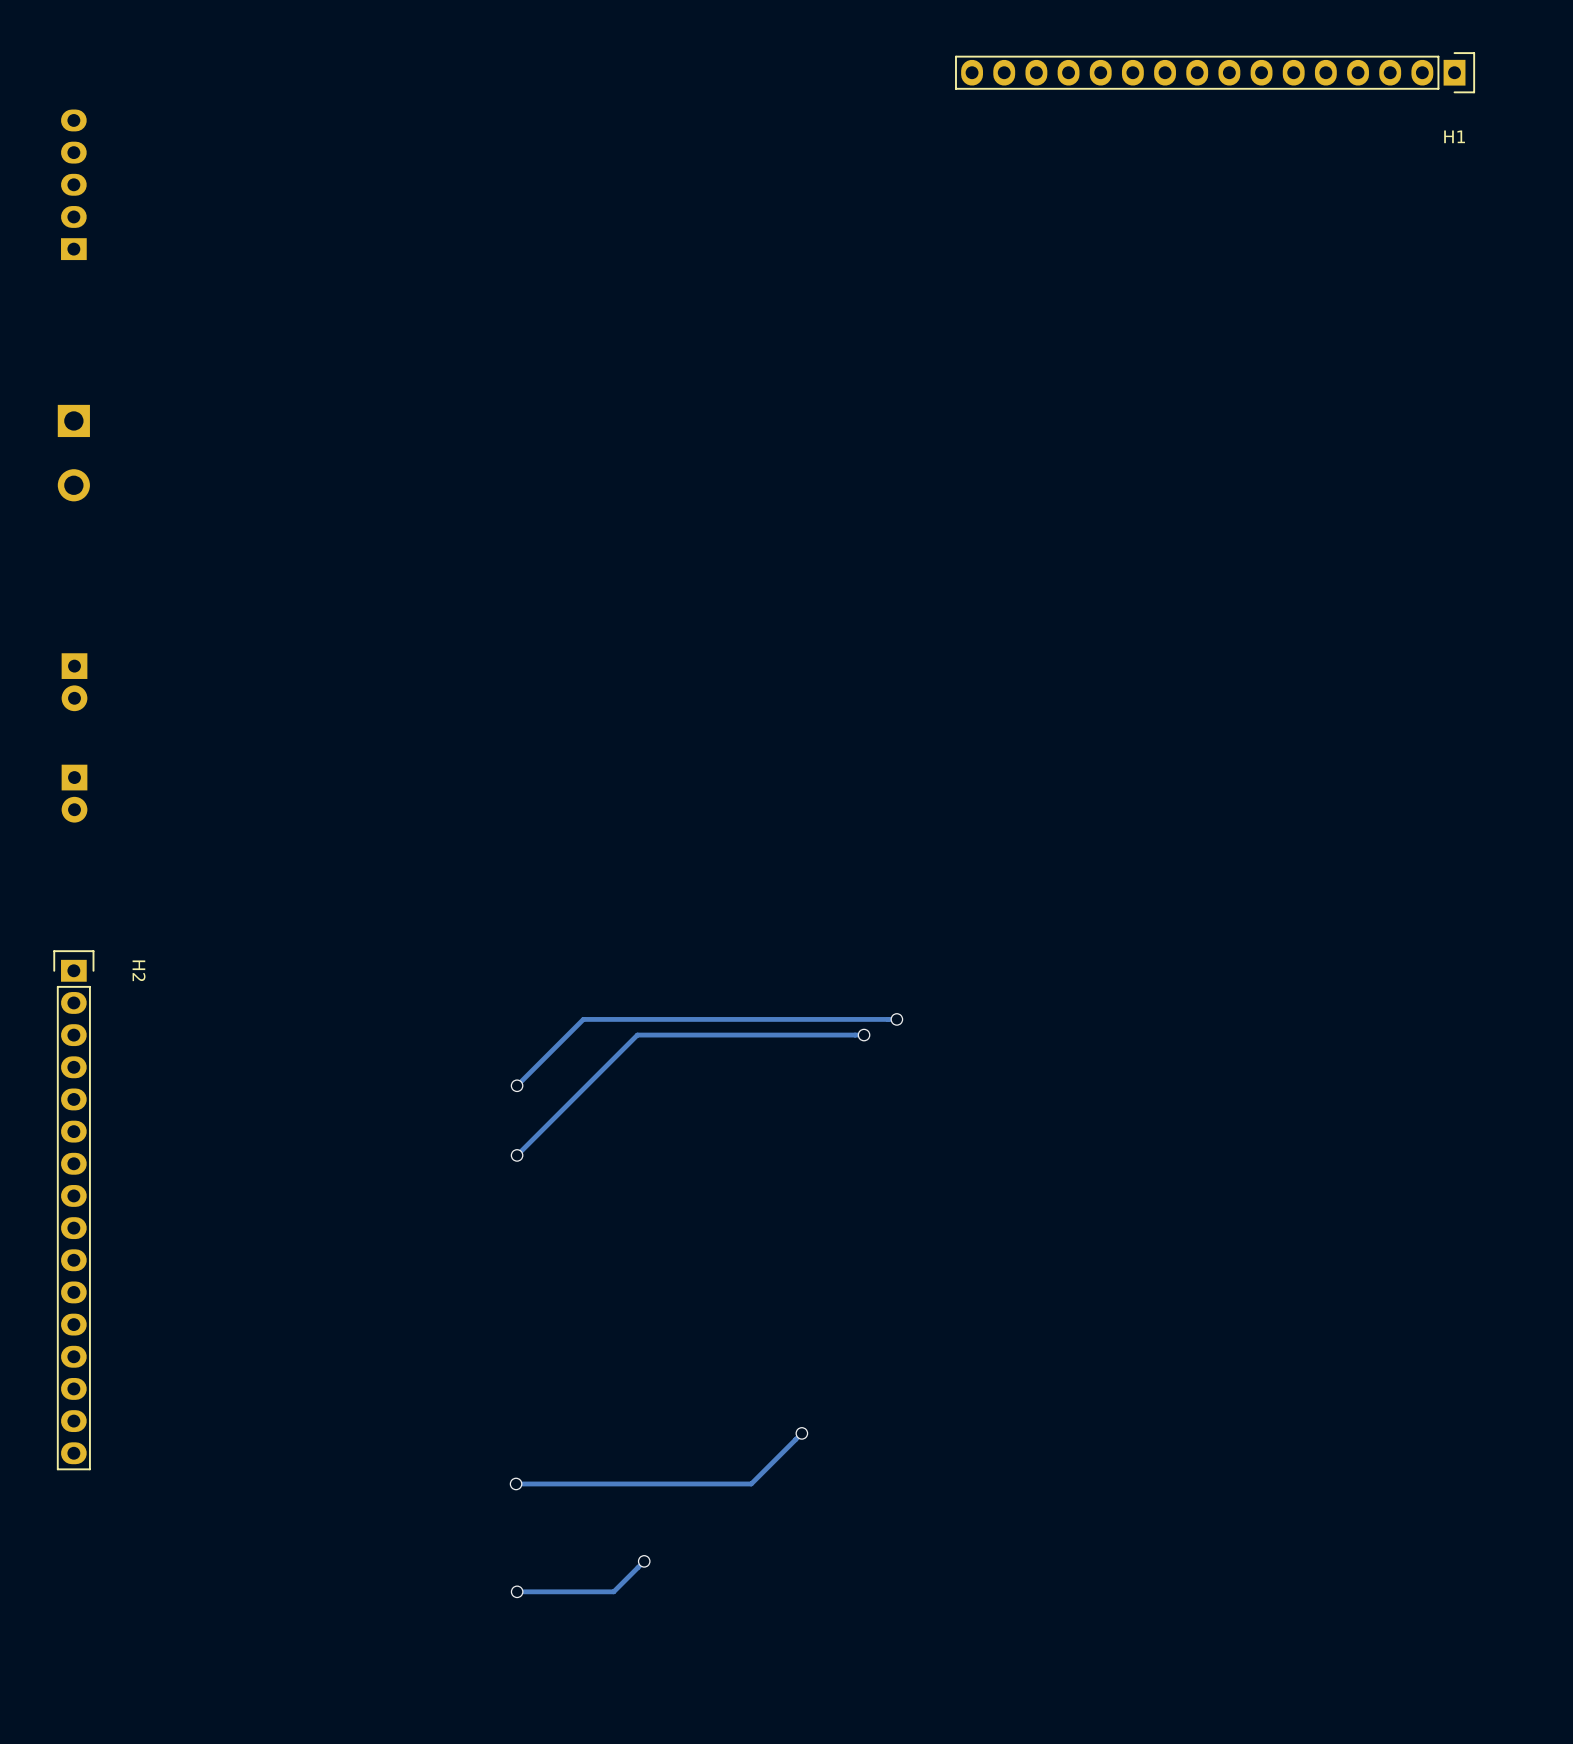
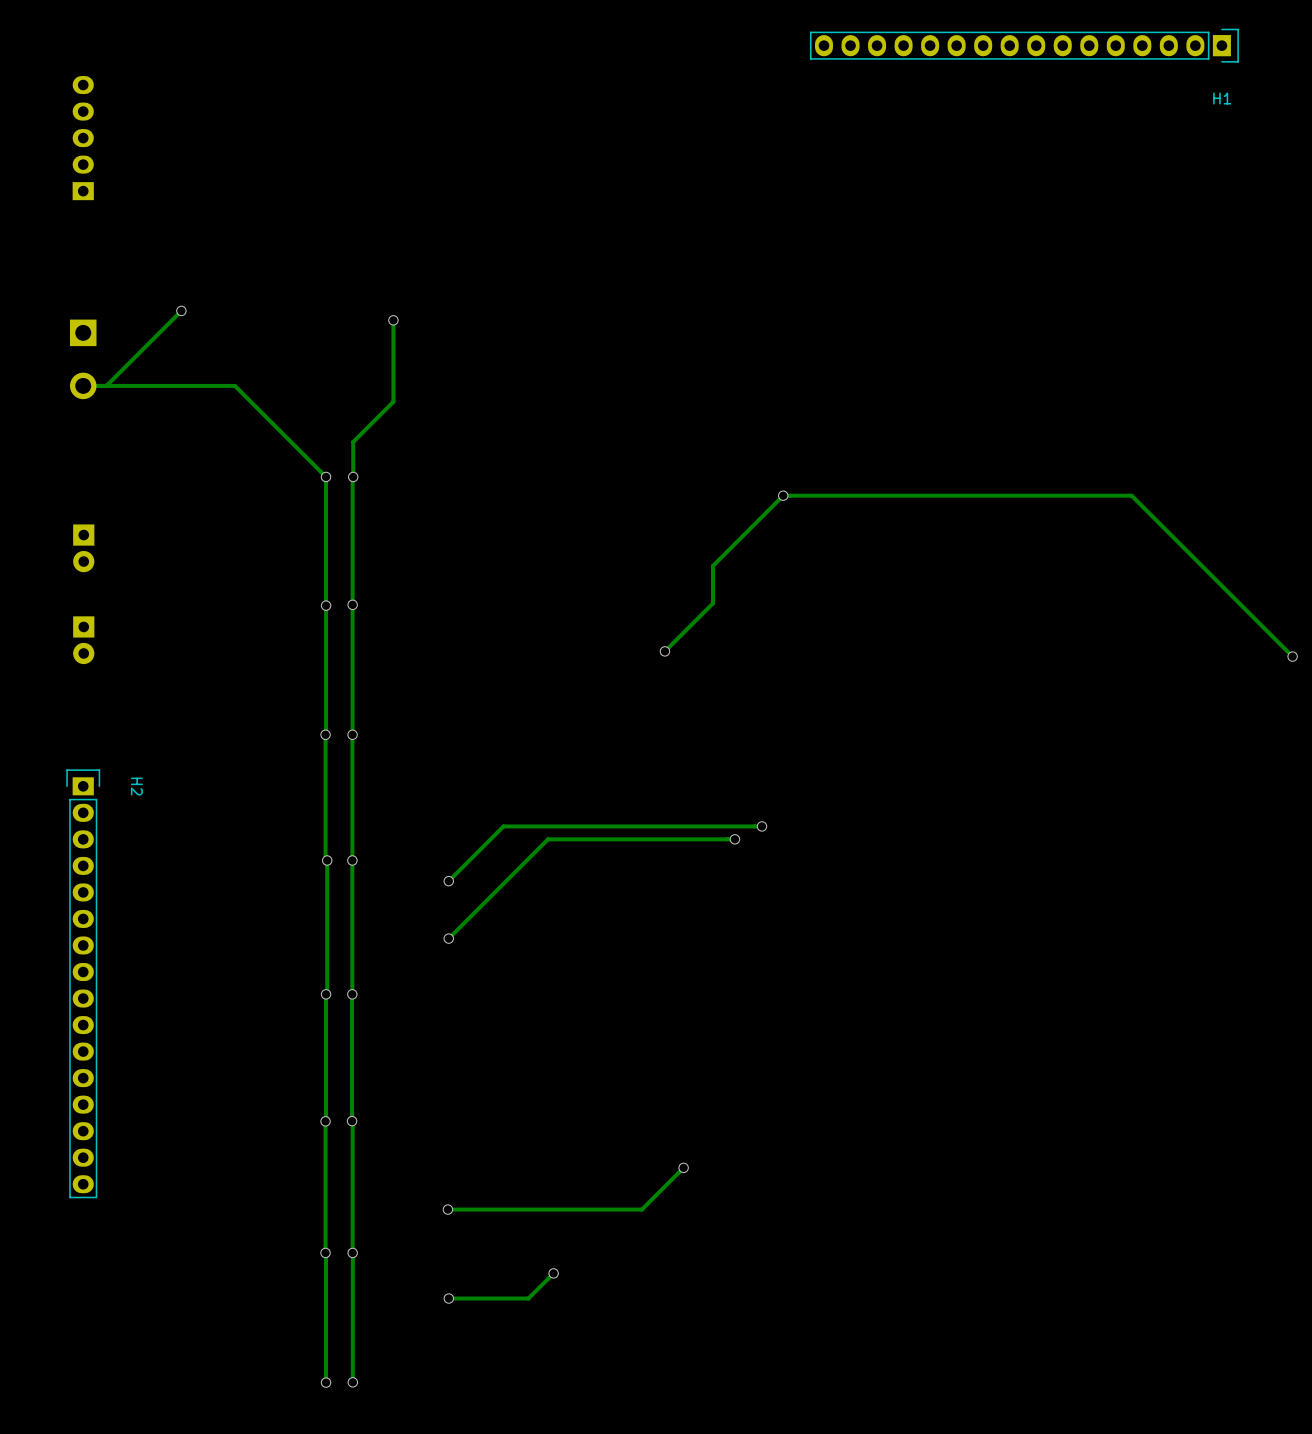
track: none -> (181, 310) (106, 385)
via: none -> (181, 310)
track: none -> (393, 320) (393, 401) (353, 441) (352, 604)
via: none -> (393, 320)
track: none -> (83, 385) (234, 385) (326, 476)
track: none -> (326, 476) (326, 1382)
via: none -> (326, 476)
via: none -> (353, 476)
via: none -> (783, 495)
track: none -> (352, 604) (352, 860)
via: none -> (352, 604)
via: none -> (326, 605)
track: none -> (664, 651) (712, 603) (712, 565) (783, 495) (1131, 495) (1292, 656)
via: none -> (664, 651)
via: none -> (1292, 656)
via: none -> (325, 734)
via: none -> (352, 734)
via: none -> (327, 860)
track: none -> (352, 860) (352, 1252)
via: none -> (352, 860)
via: none -> (326, 994)
via: none -> (352, 994)
via: none -> (352, 1121)
via: none -> (325, 1121)
via: none -> (325, 1252)
track: none -> (352, 1253) (352, 1382)
via: none -> (352, 1252)
via: none -> (326, 1382)
via: none -> (352, 1382)

